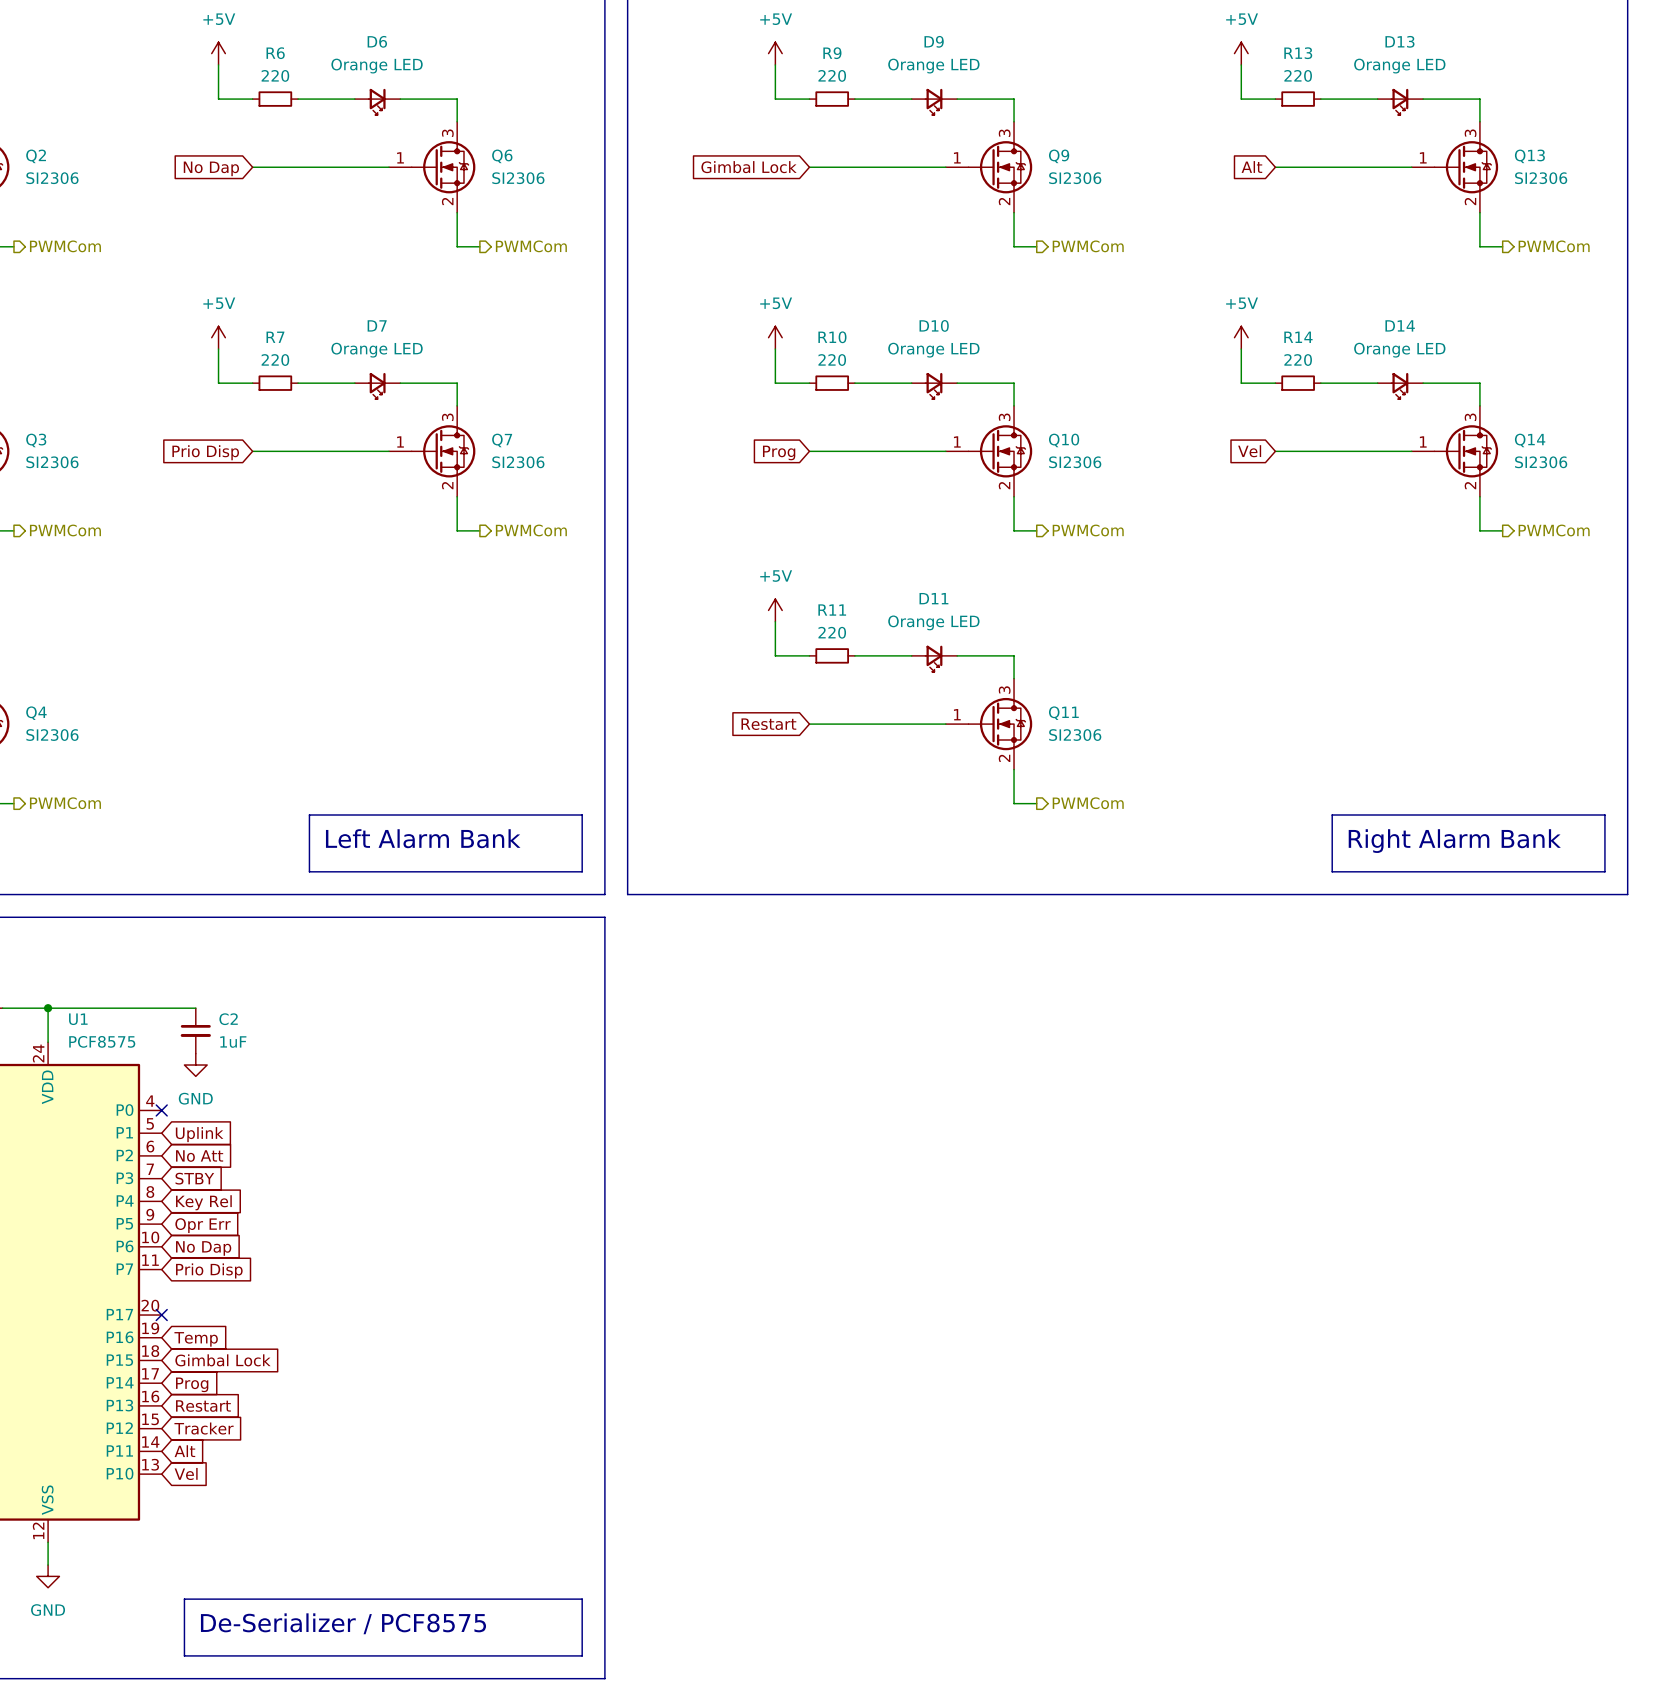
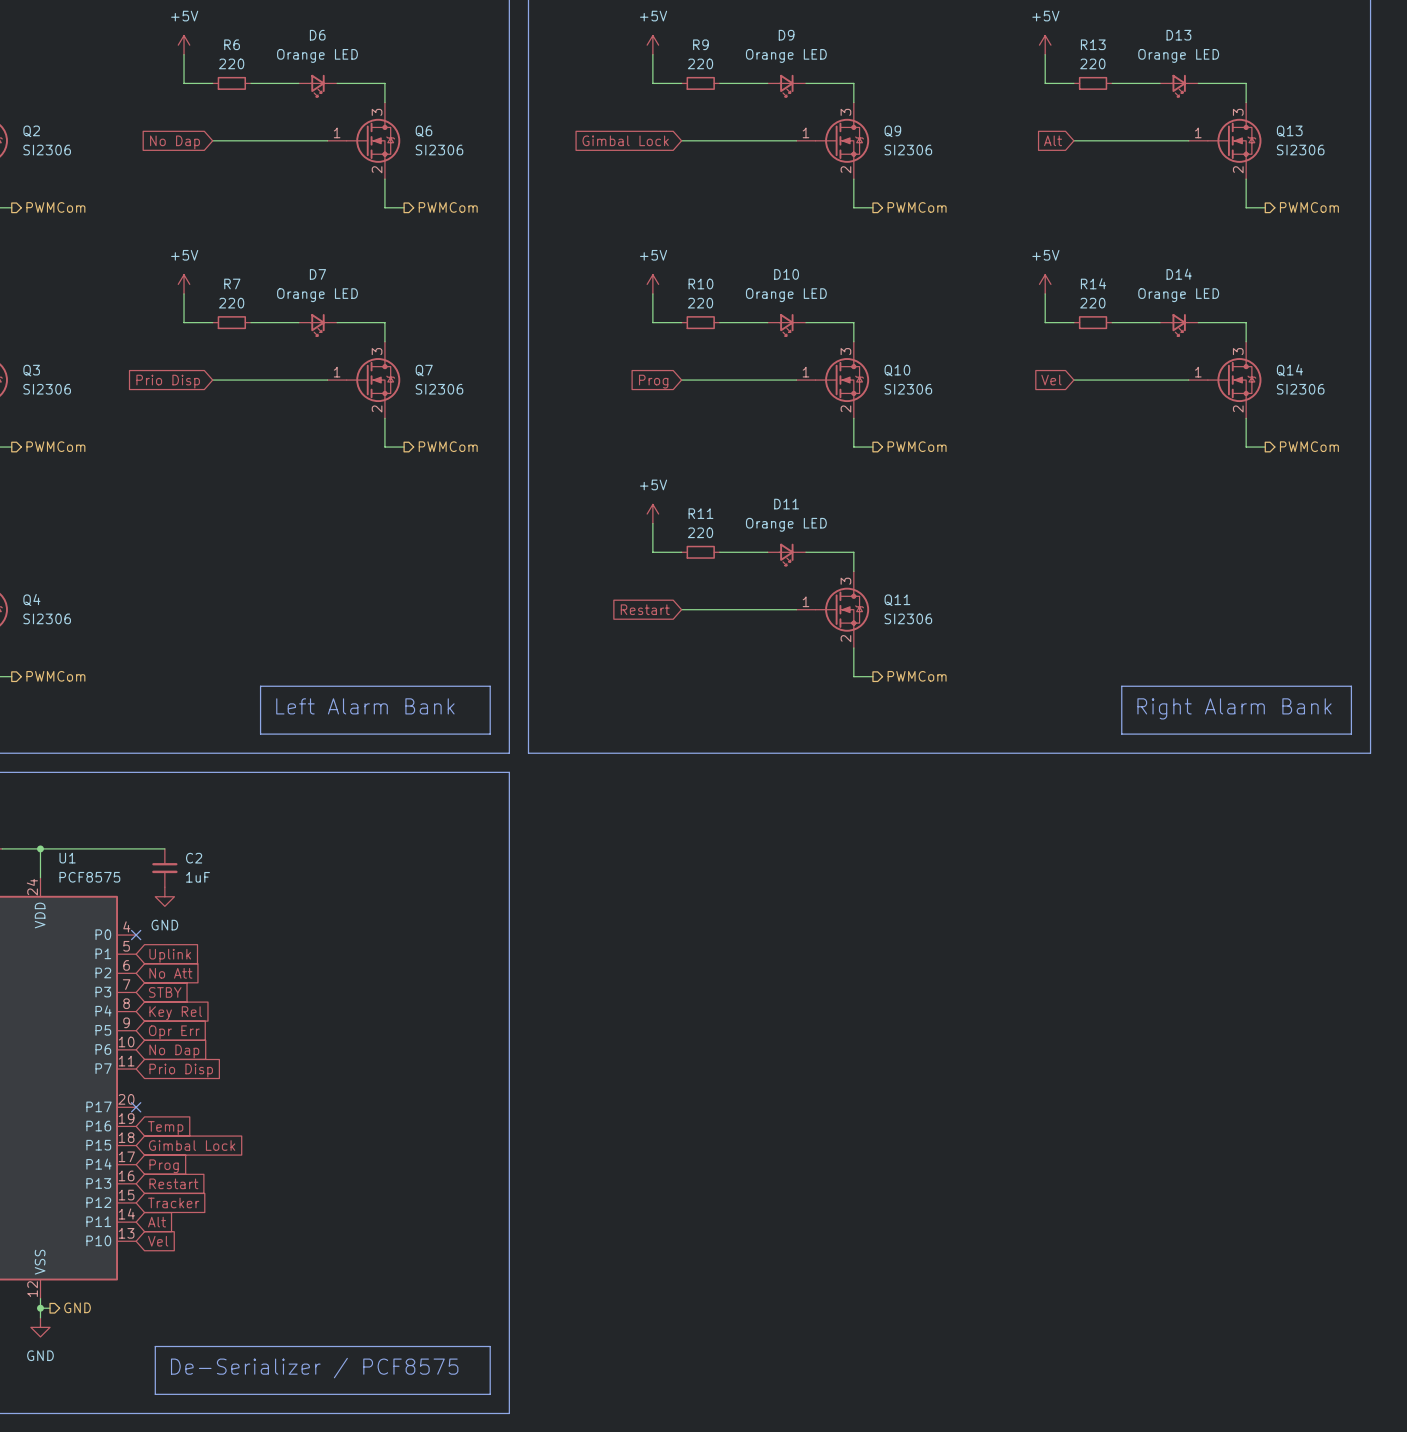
wire: none -> (40, 1308) (50, 1308)
junction: none -> (40, 1308)
hierarchical label: none -> GND (77, 1307)

